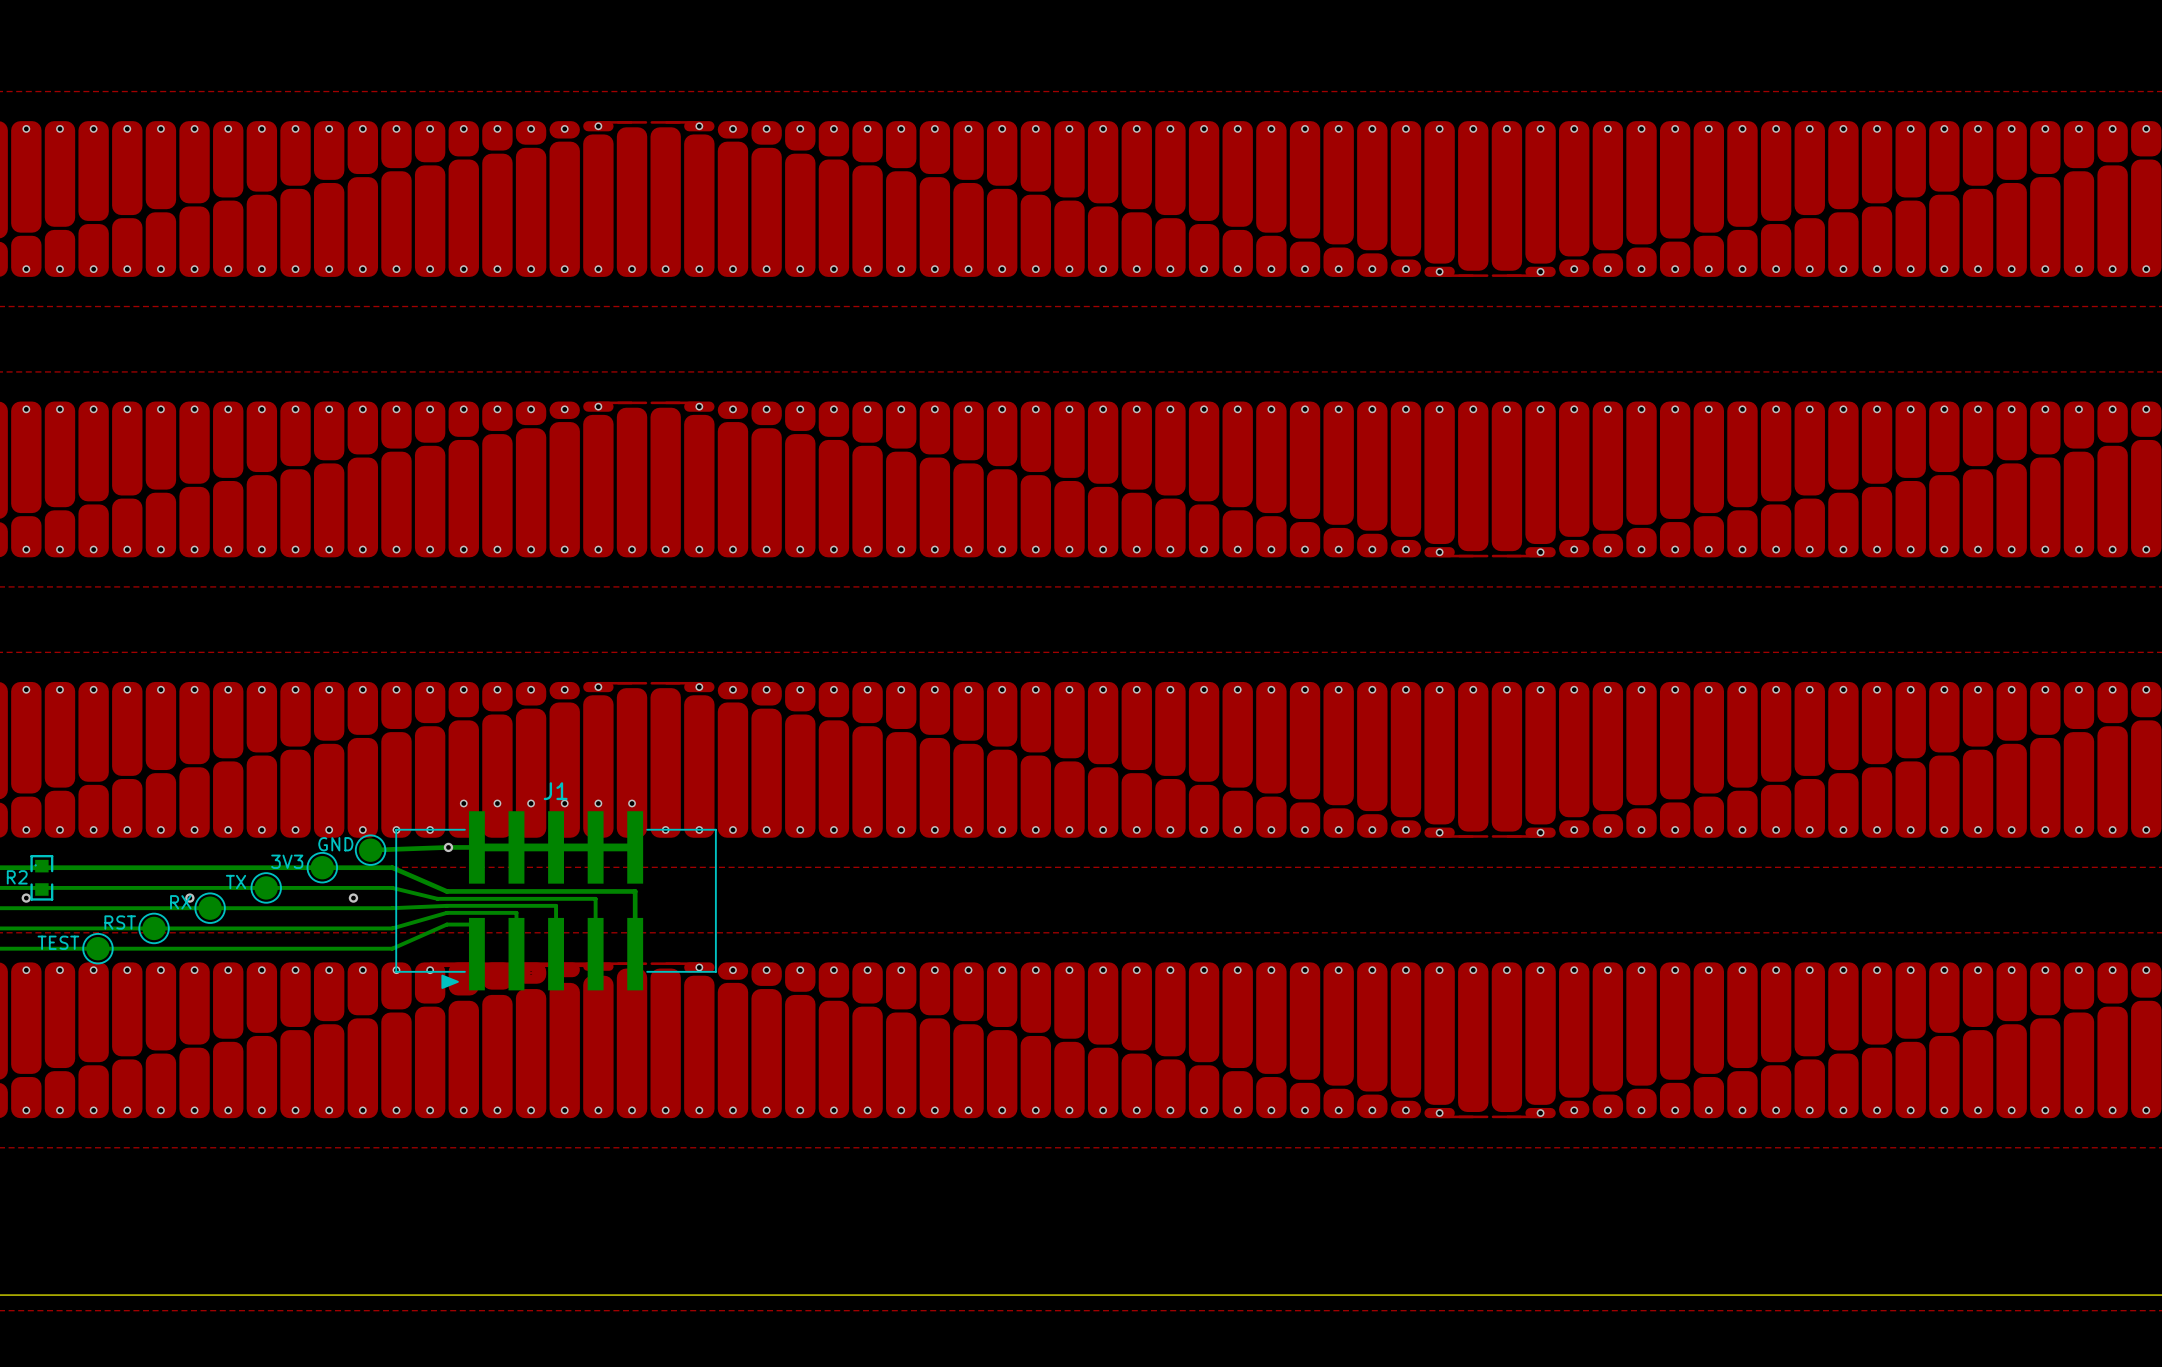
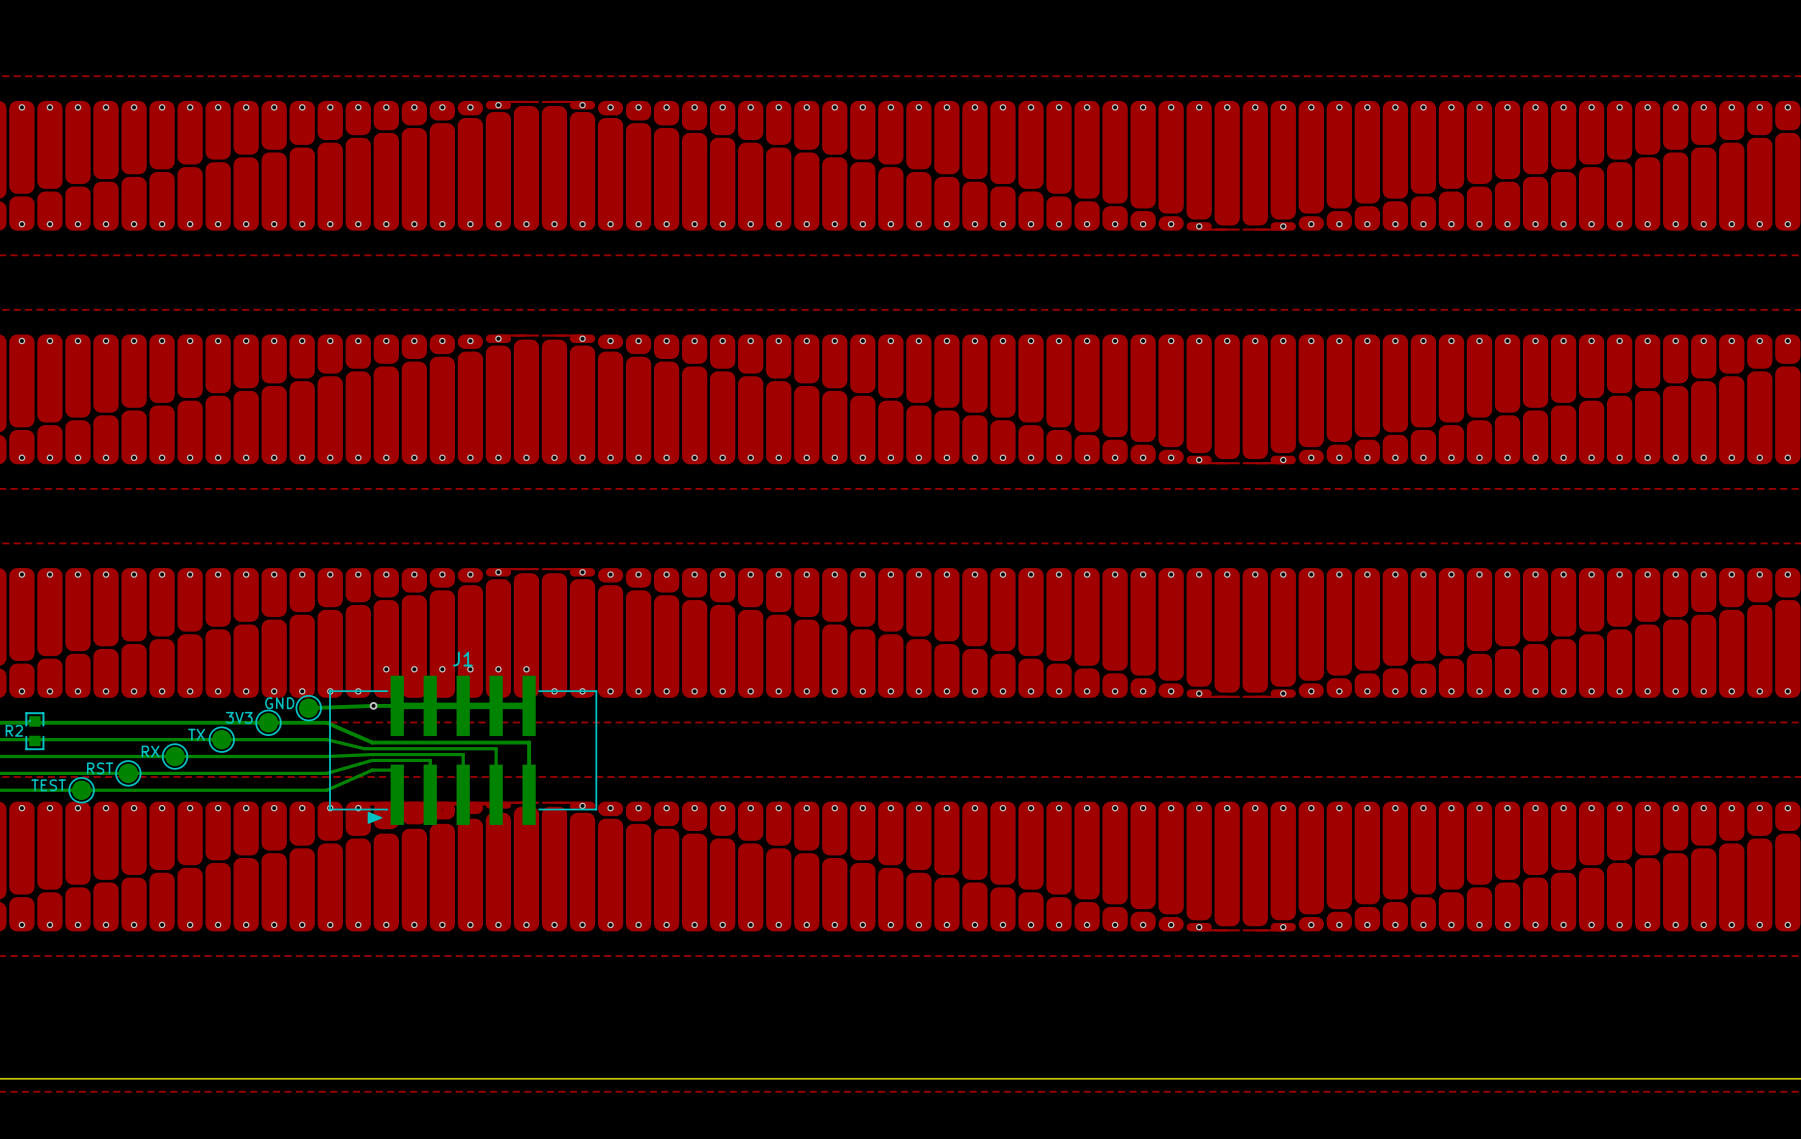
via: (26, 898) -> none
via: (189, 898) -> none
via: (353, 898) -> none

